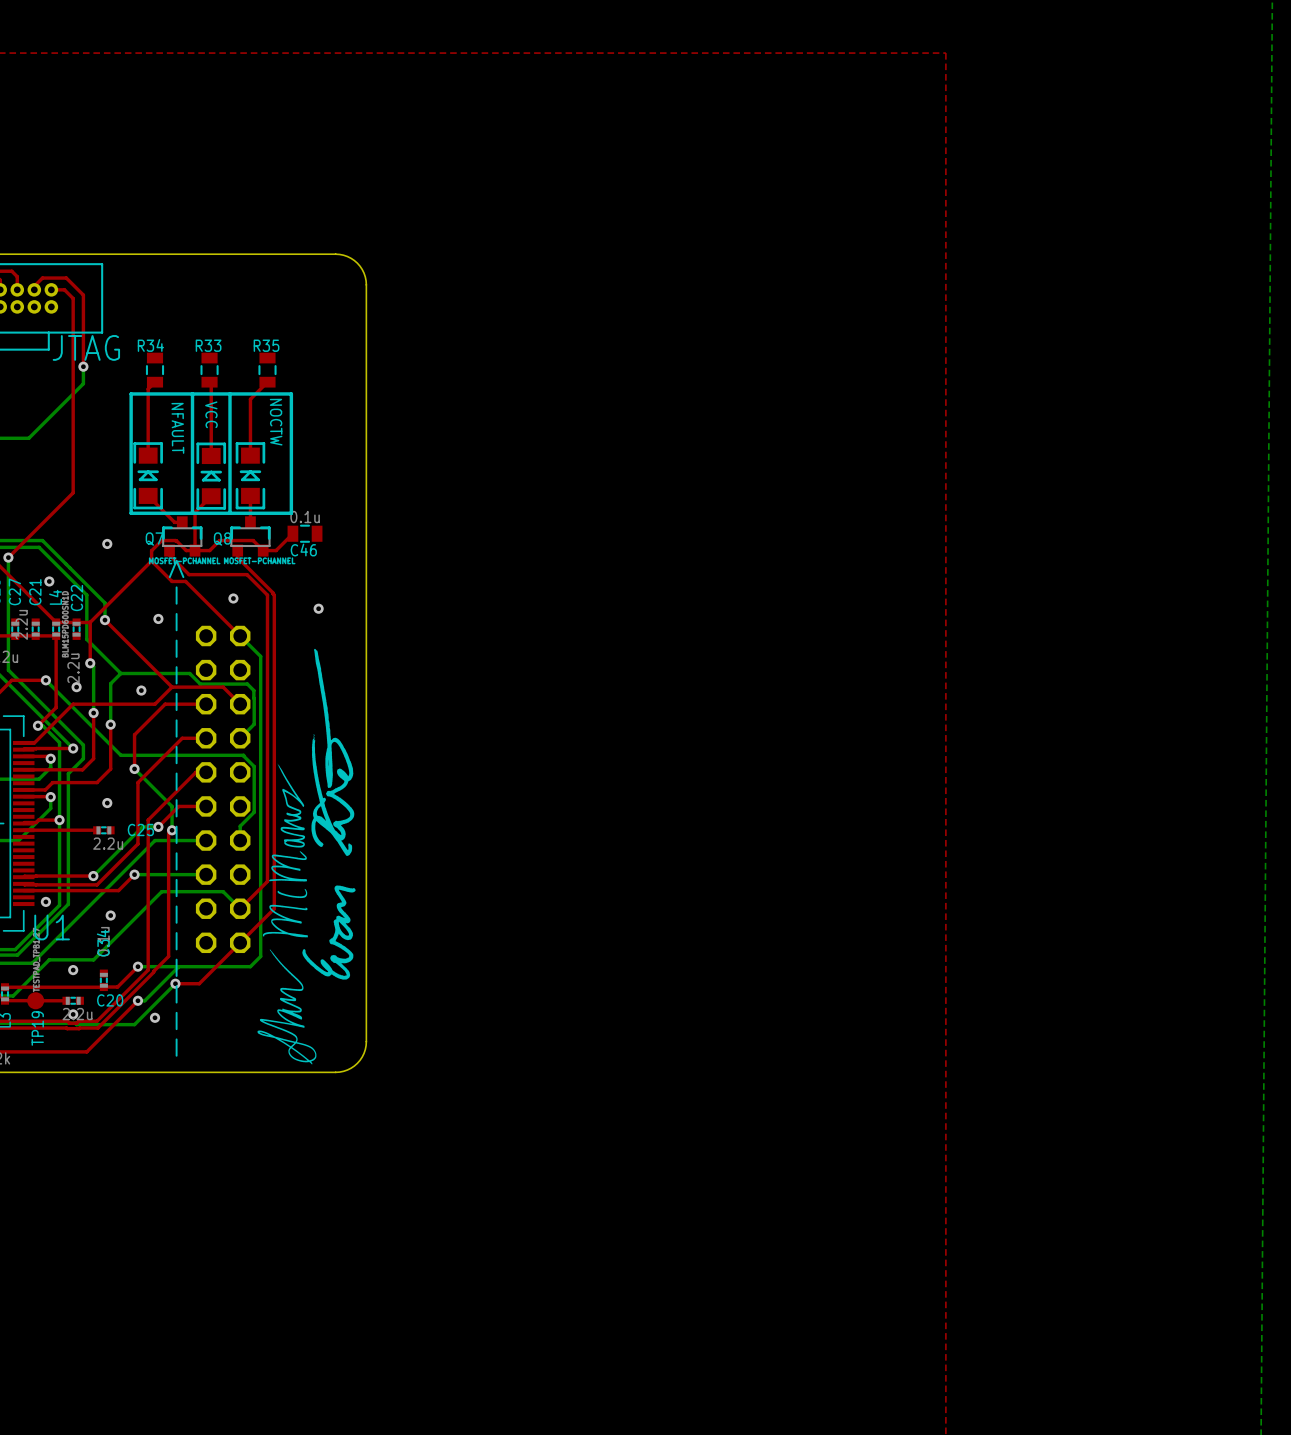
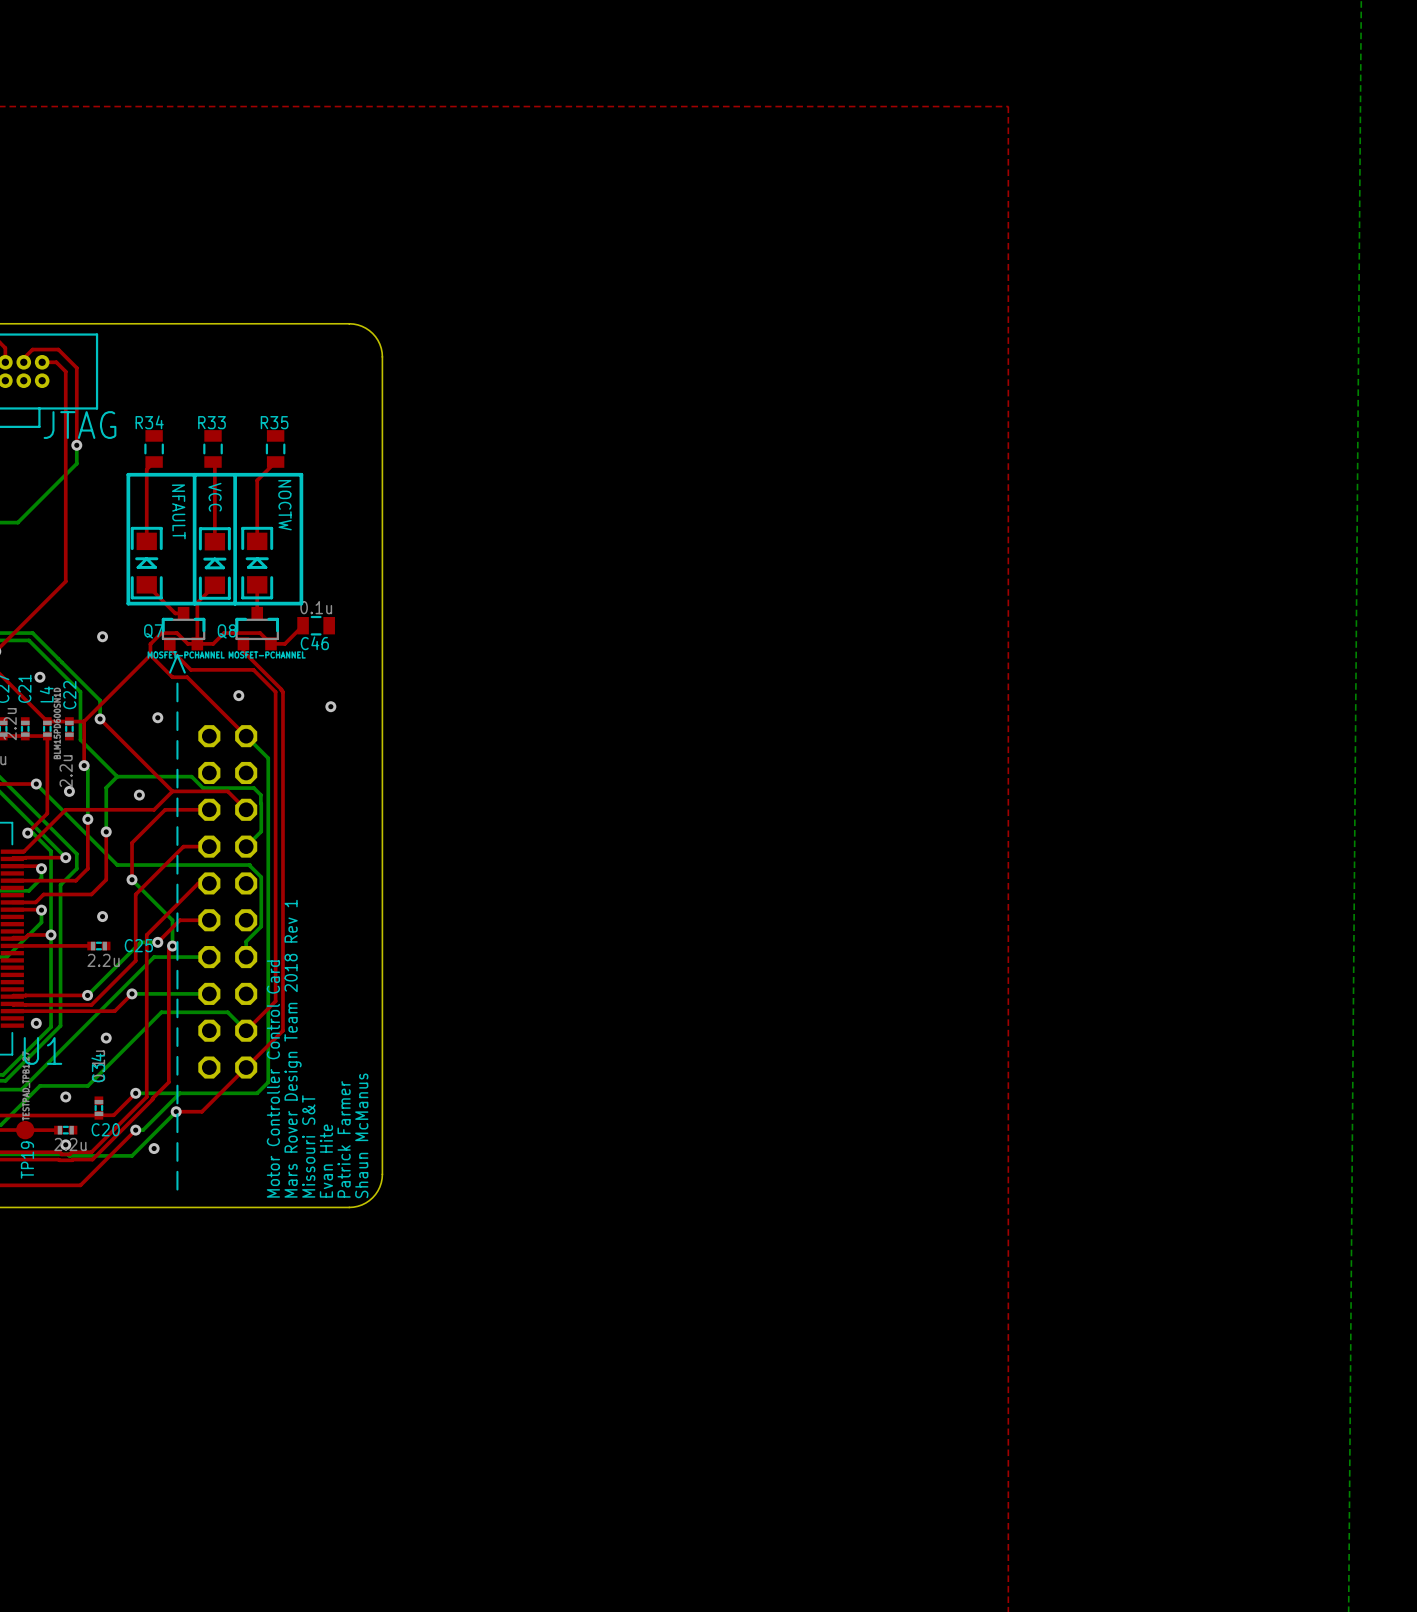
drawing: [257, 648, 356, 1065] -> none
text: none -> Mars Rover Design Team 2018 Rev 1 (293, 1048)
text: none -> Motor Controller Control Card (273, 1079)
text: none -> Shaun McManus (361, 1135)
text: none -> Patrick Farmer (344, 1139)
text: none -> Missouri S&T (308, 1146)
text: none -> Evan Hite (326, 1161)

